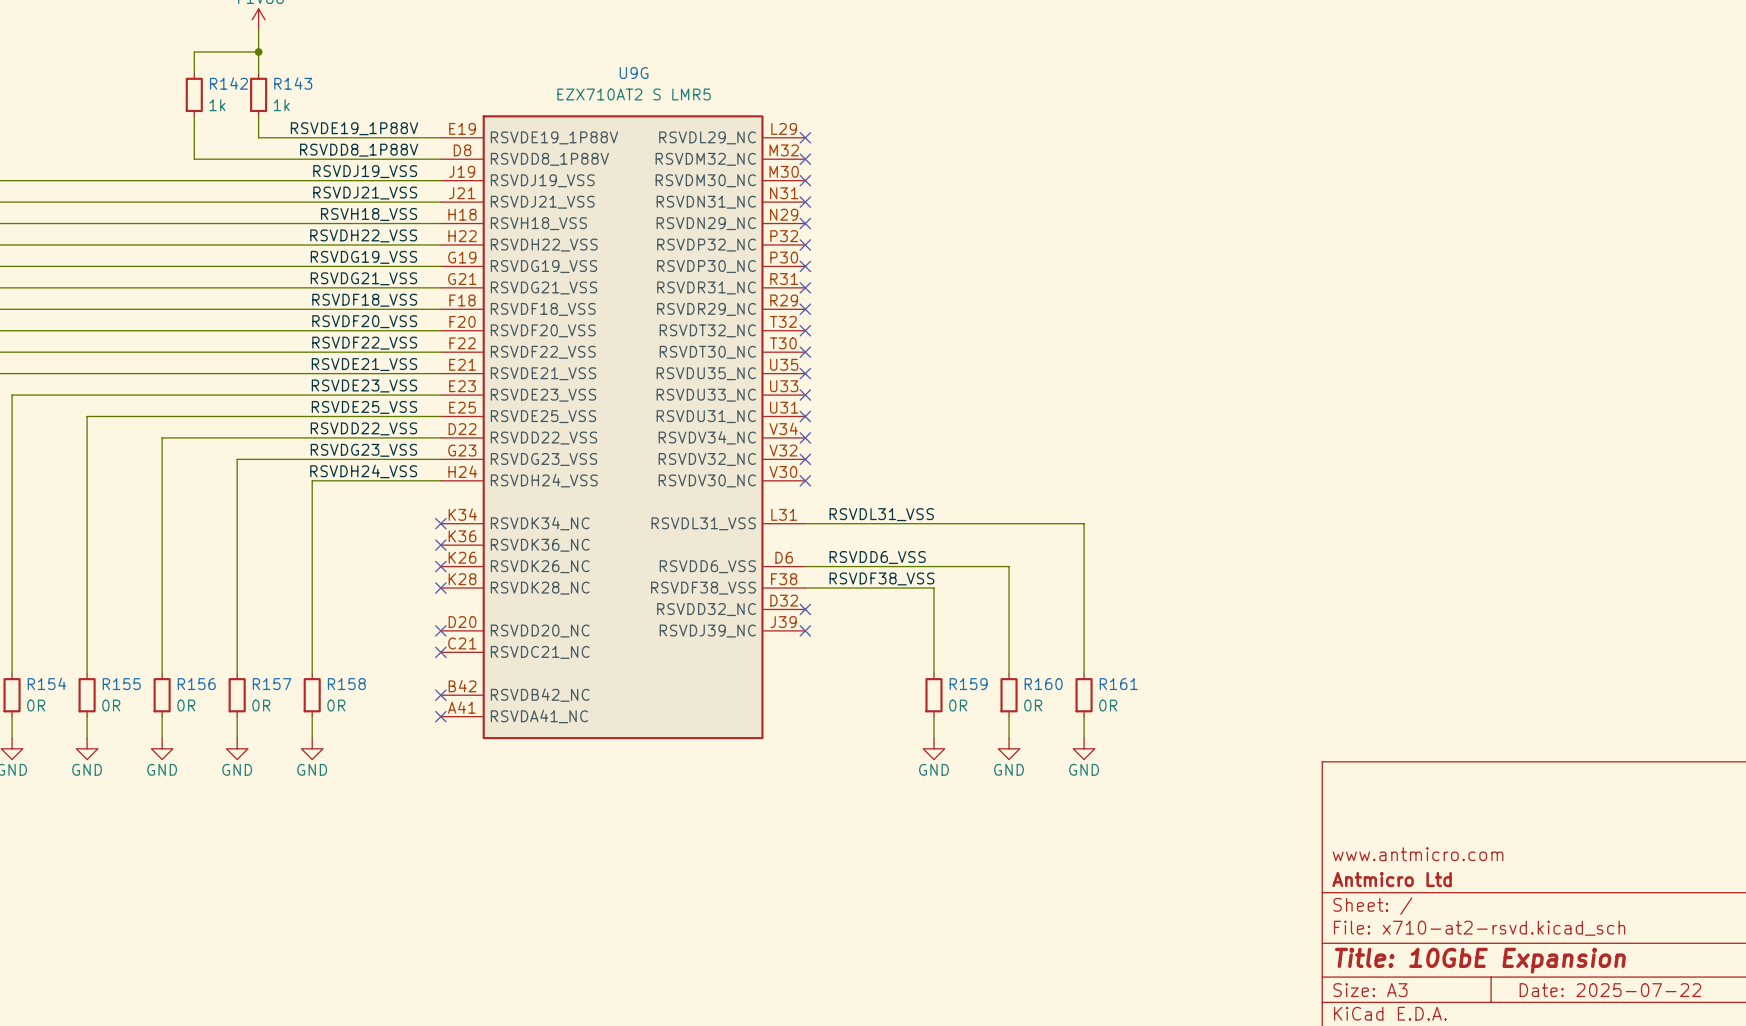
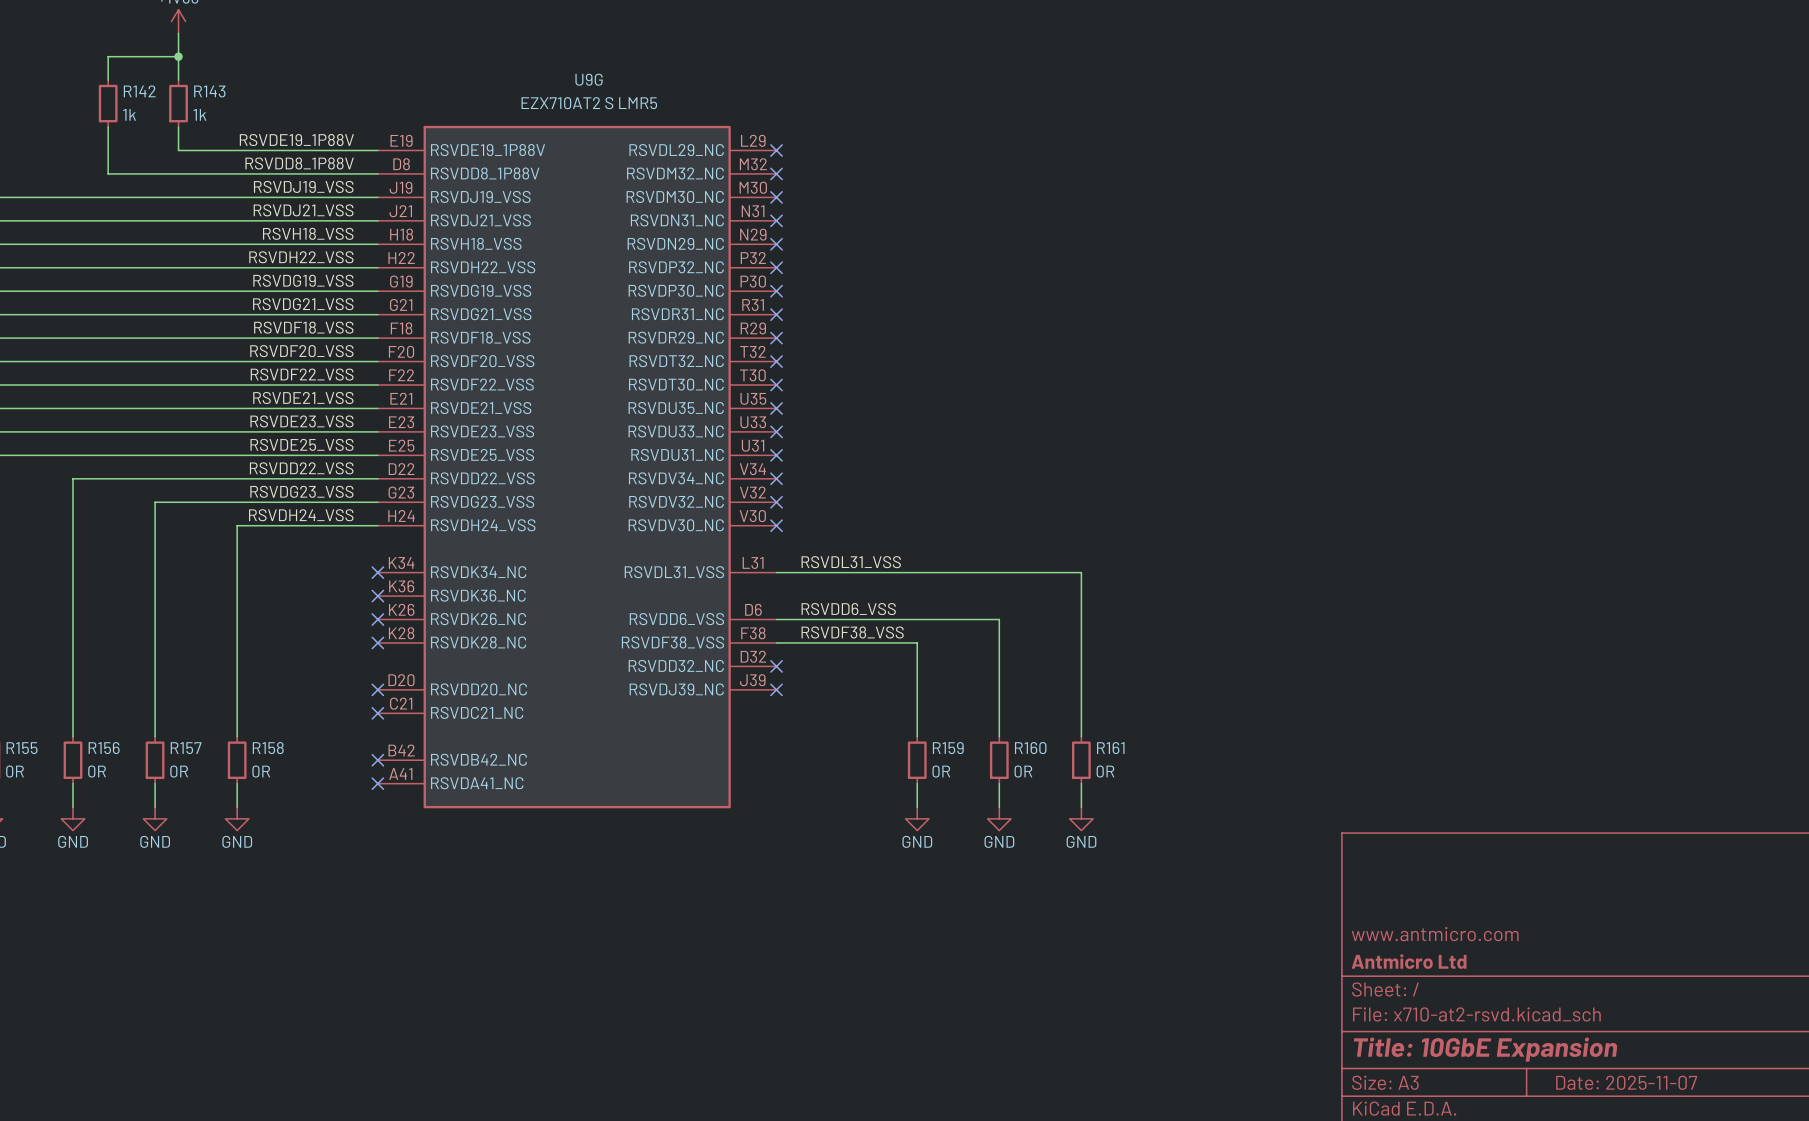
title block: Date: 2025-07-22 (1610, 990) -> Date: 2025-11-07 (1626, 1082)

